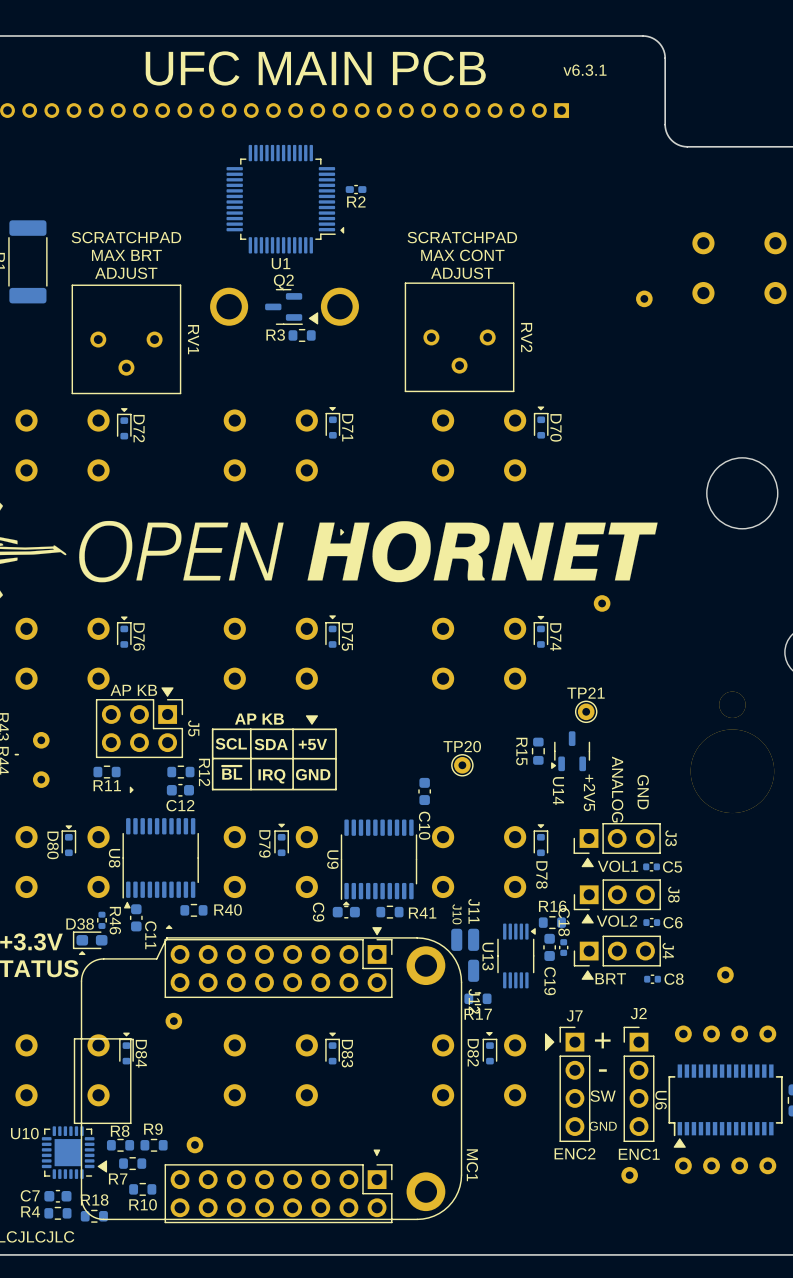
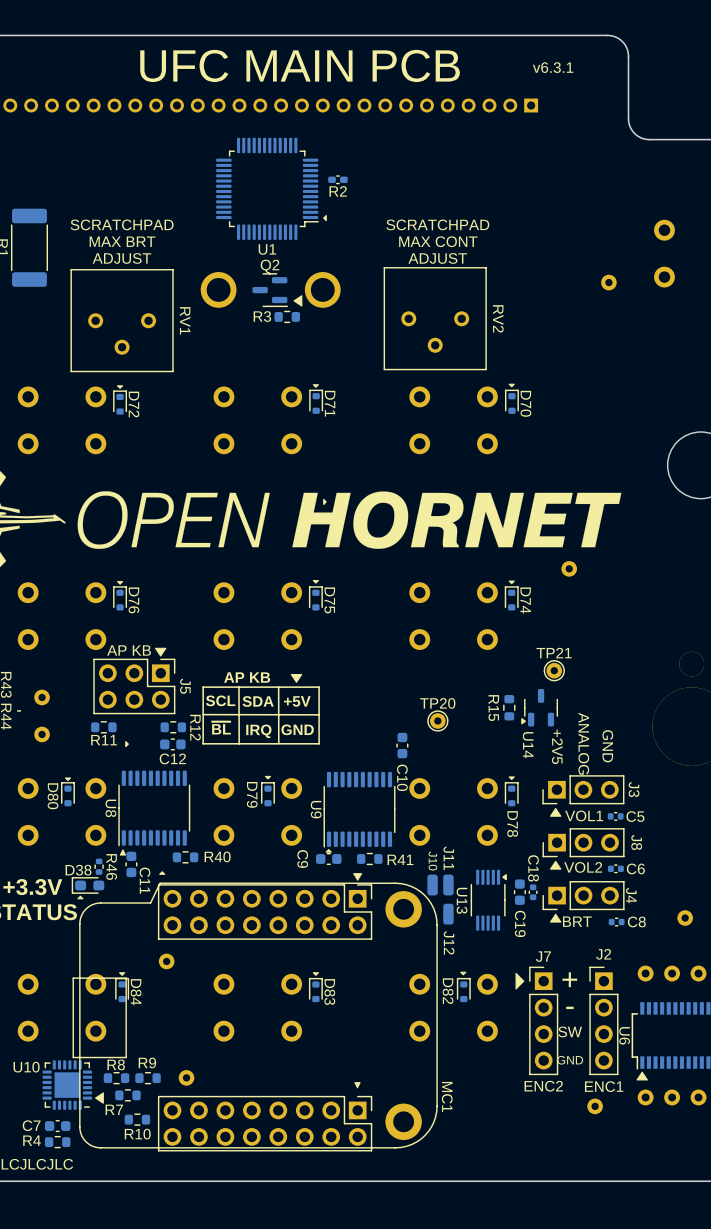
R16: (552, 922) -> none
R17: (477, 998) -> none
R18: (94, 1216) -> none

